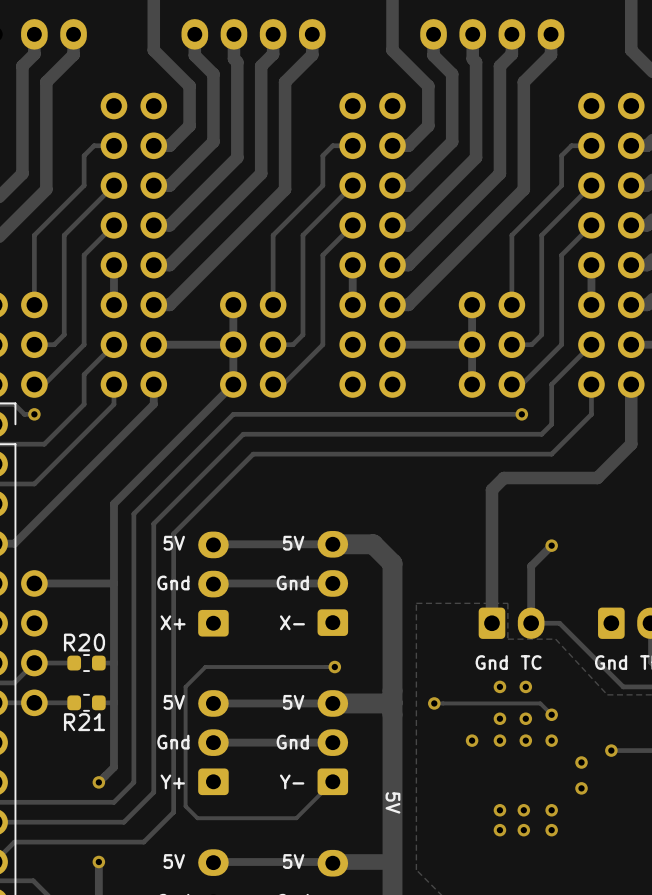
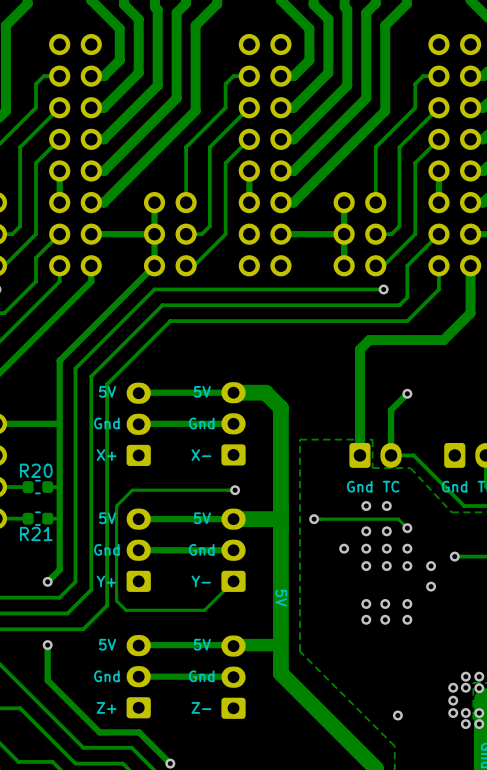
via: none -> (366, 566)
via: none -> (386, 566)
via: none -> (407, 566)

